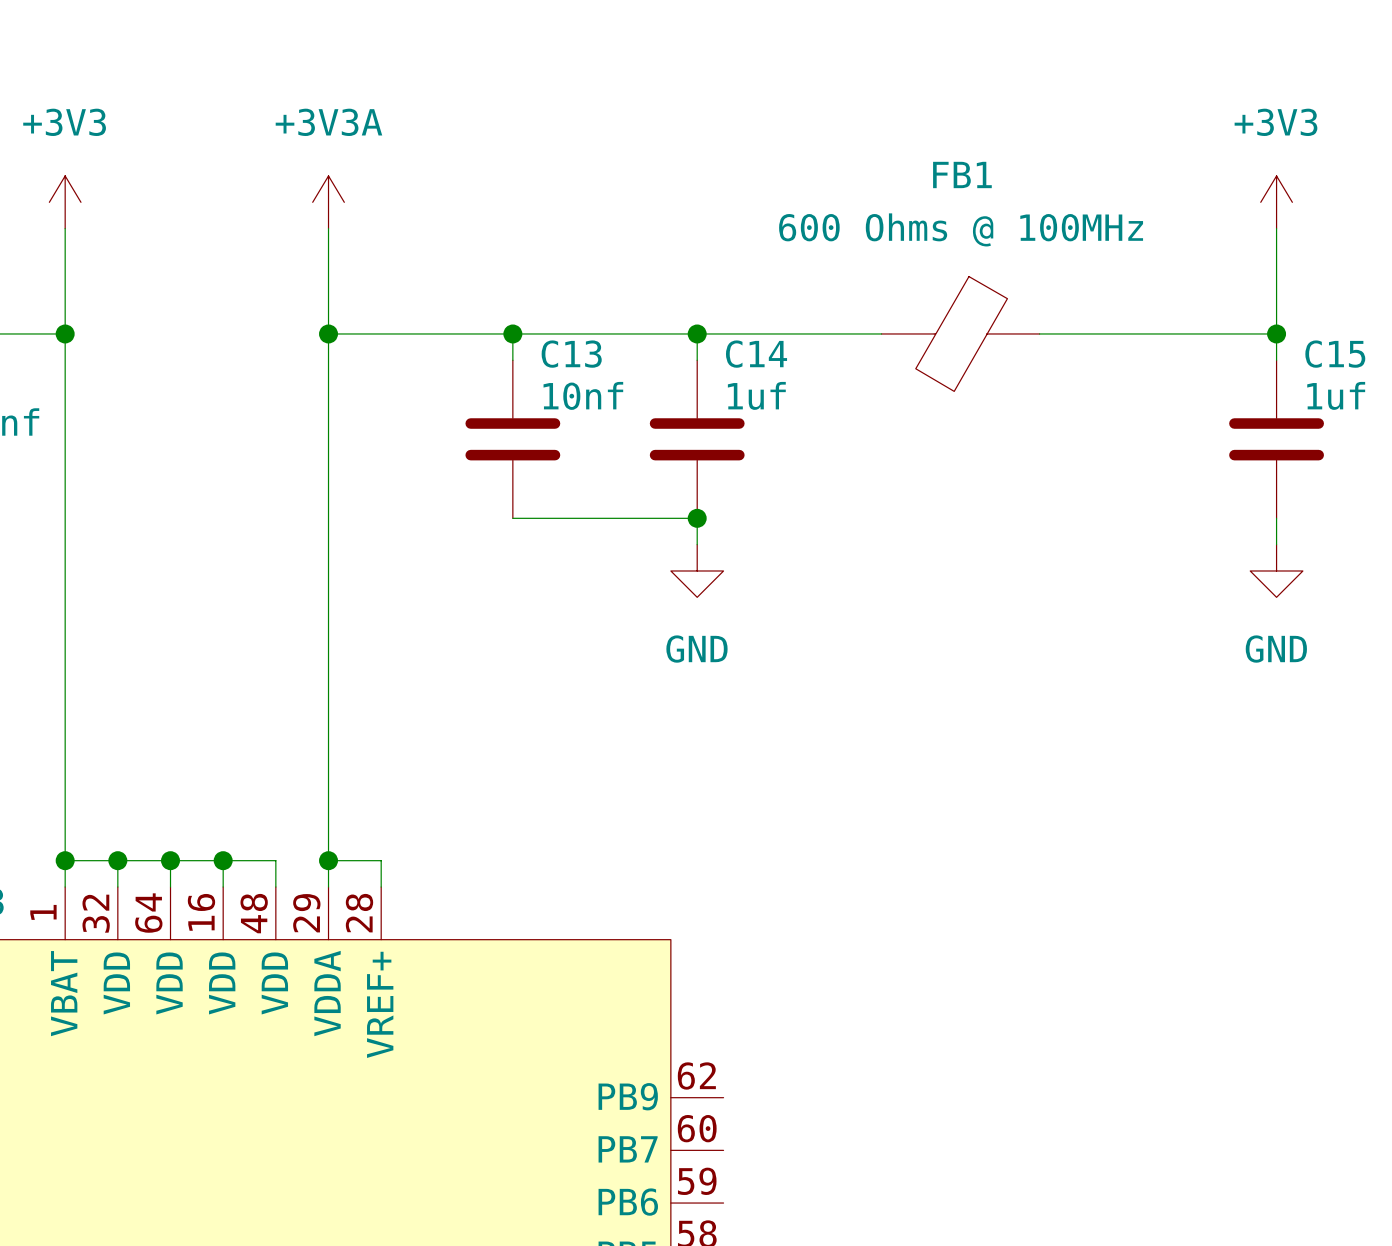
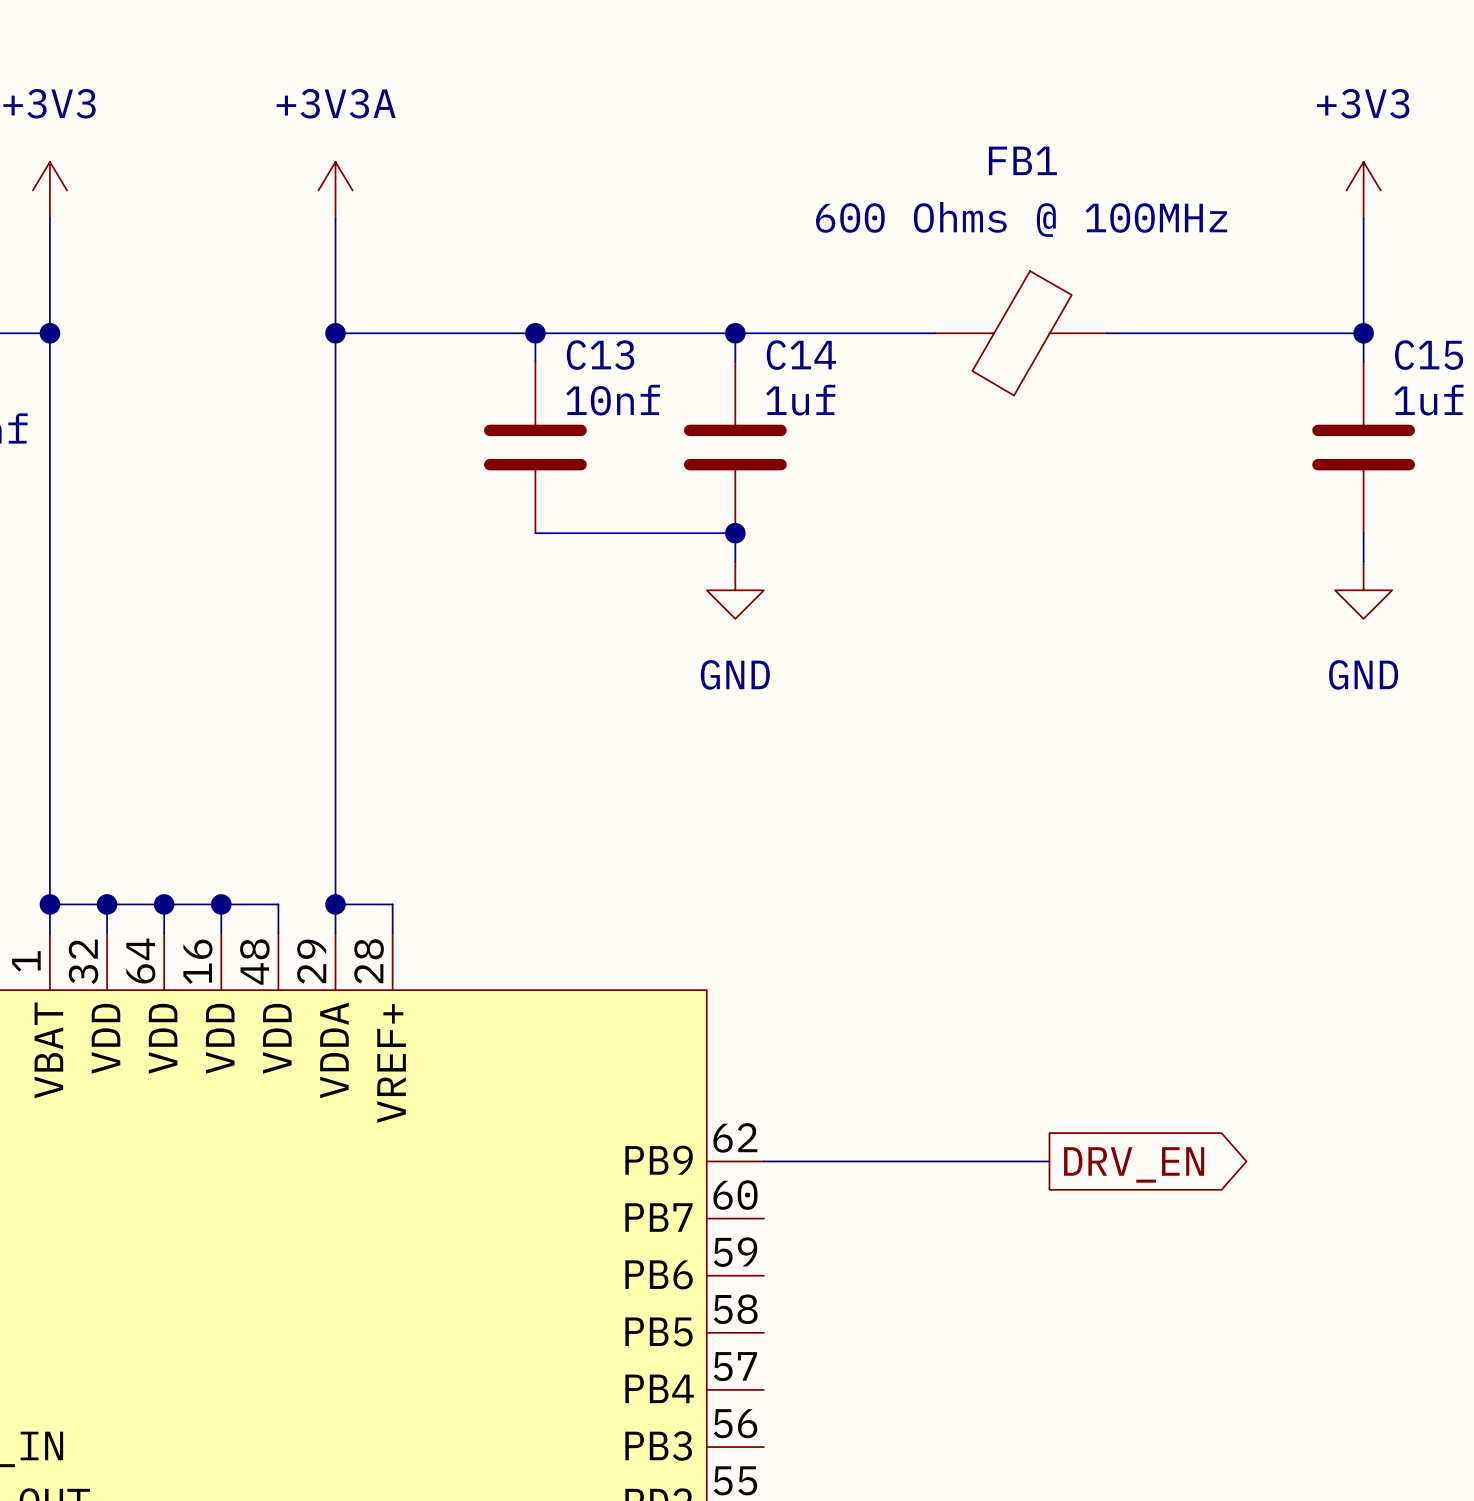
wire: none -> (763, 1161) (1049, 1161)
global label: none -> DRV_EN (1134, 1164)

